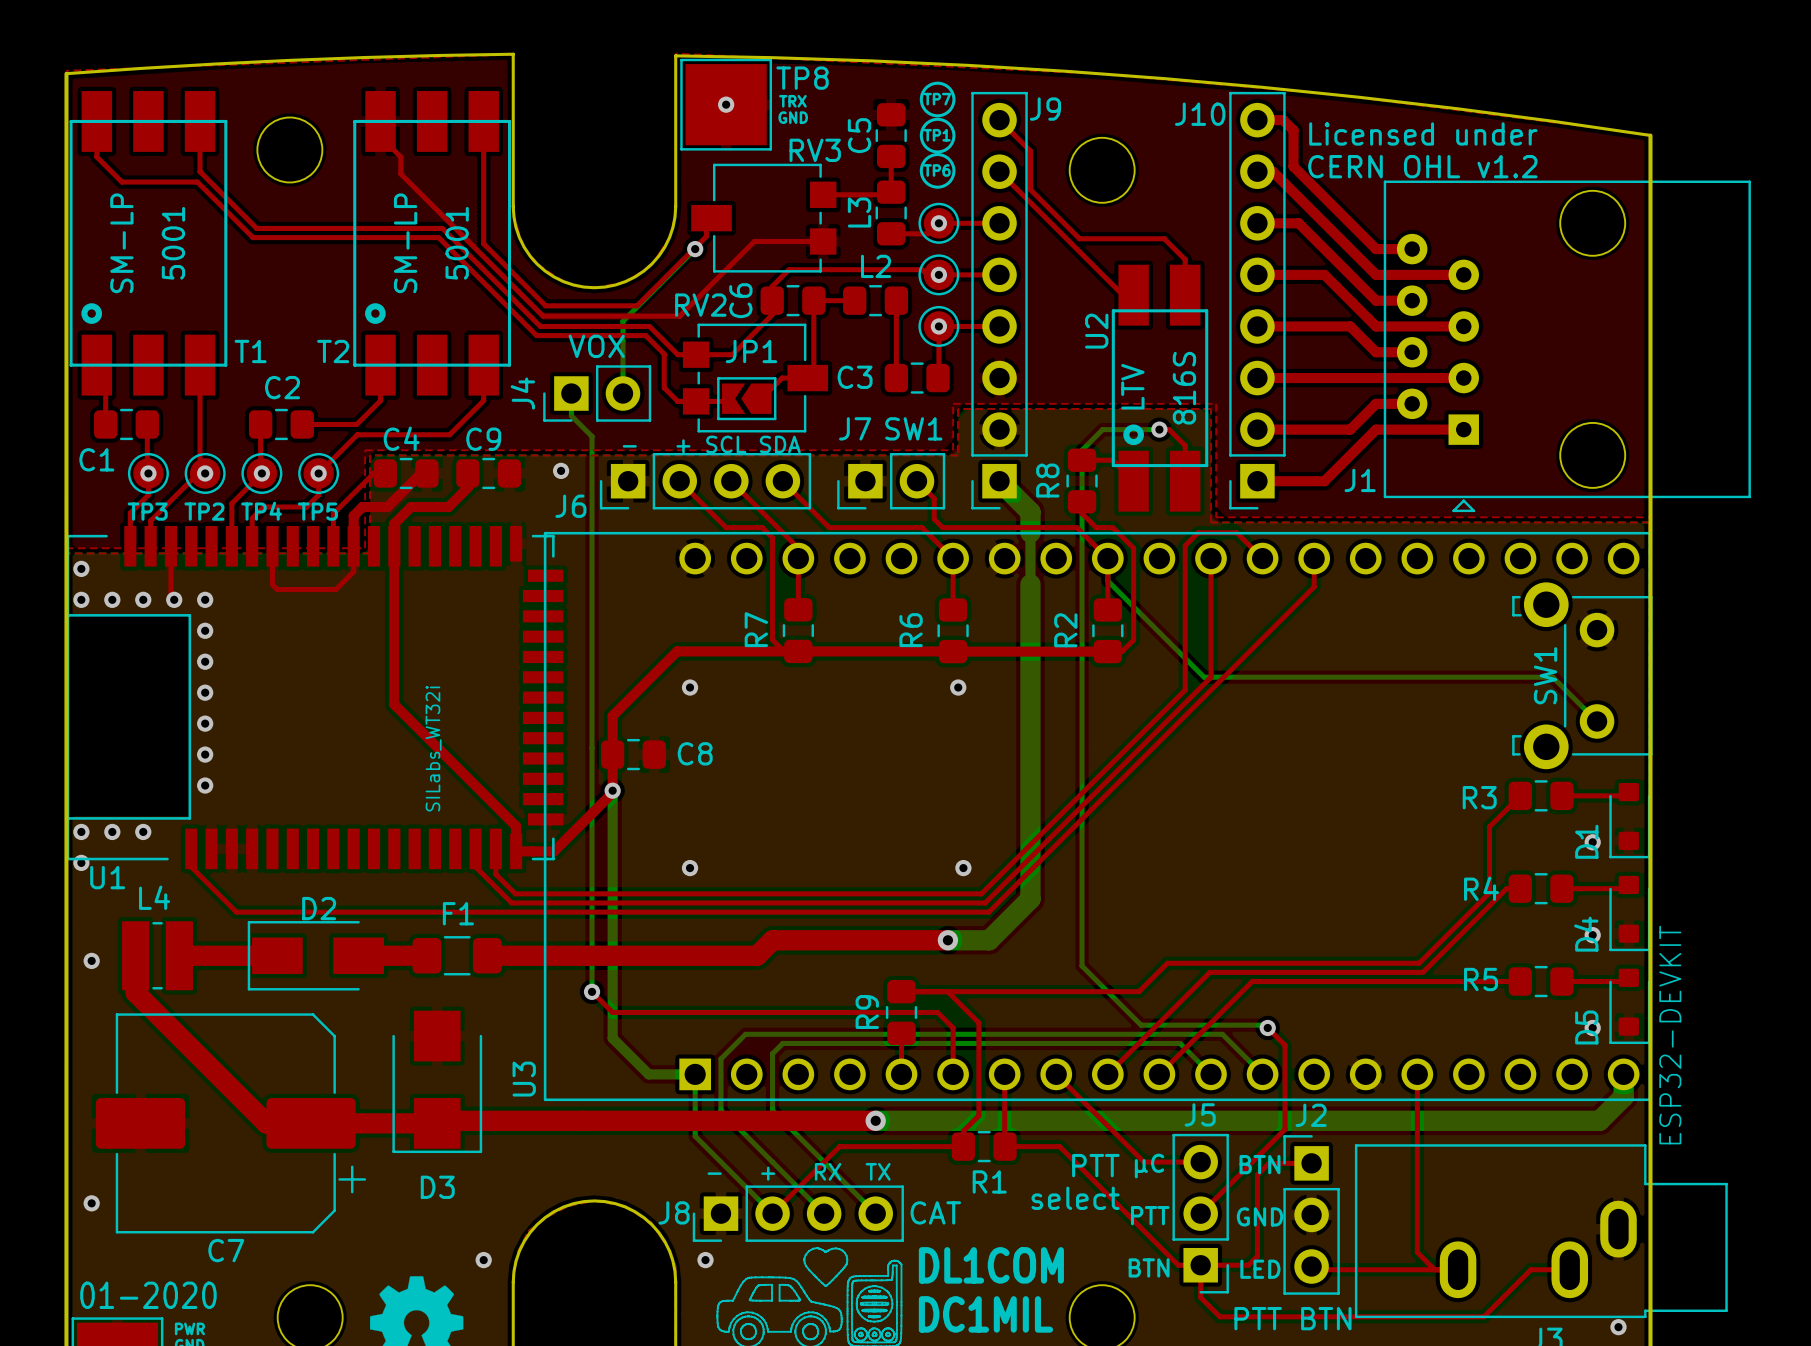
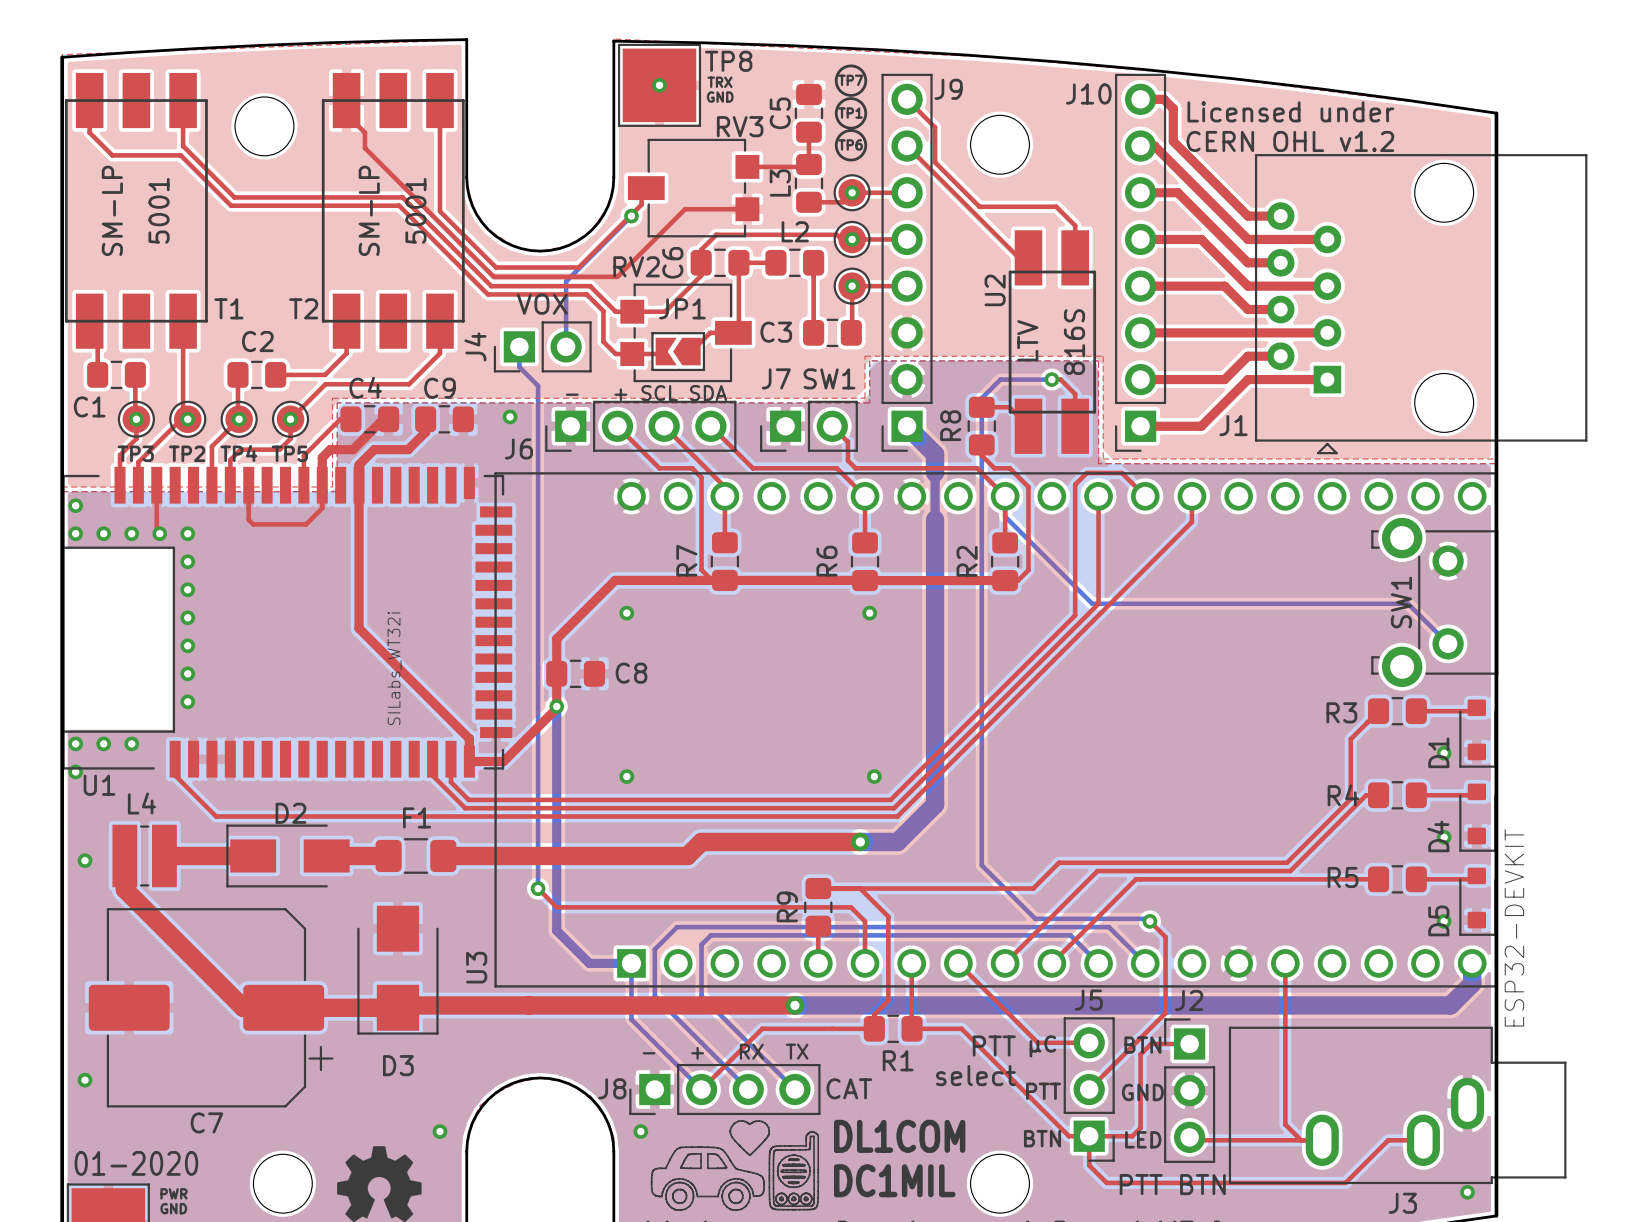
T1 footprint: [69, 90, 228, 396] -> [64, 72, 208, 349]
T2 footprint: [353, 90, 512, 396] -> [321, 72, 465, 349]
U2 footprint: [1111, 264, 1209, 512] -> [1008, 230, 1097, 454]

